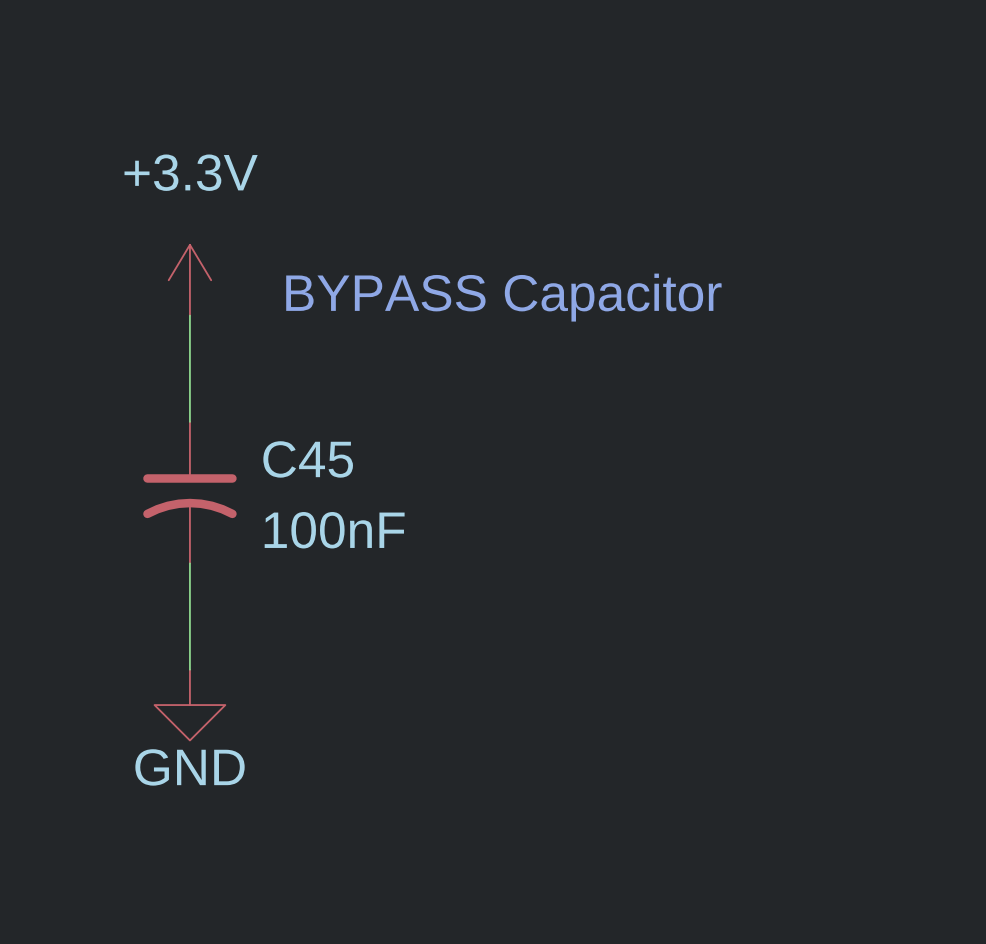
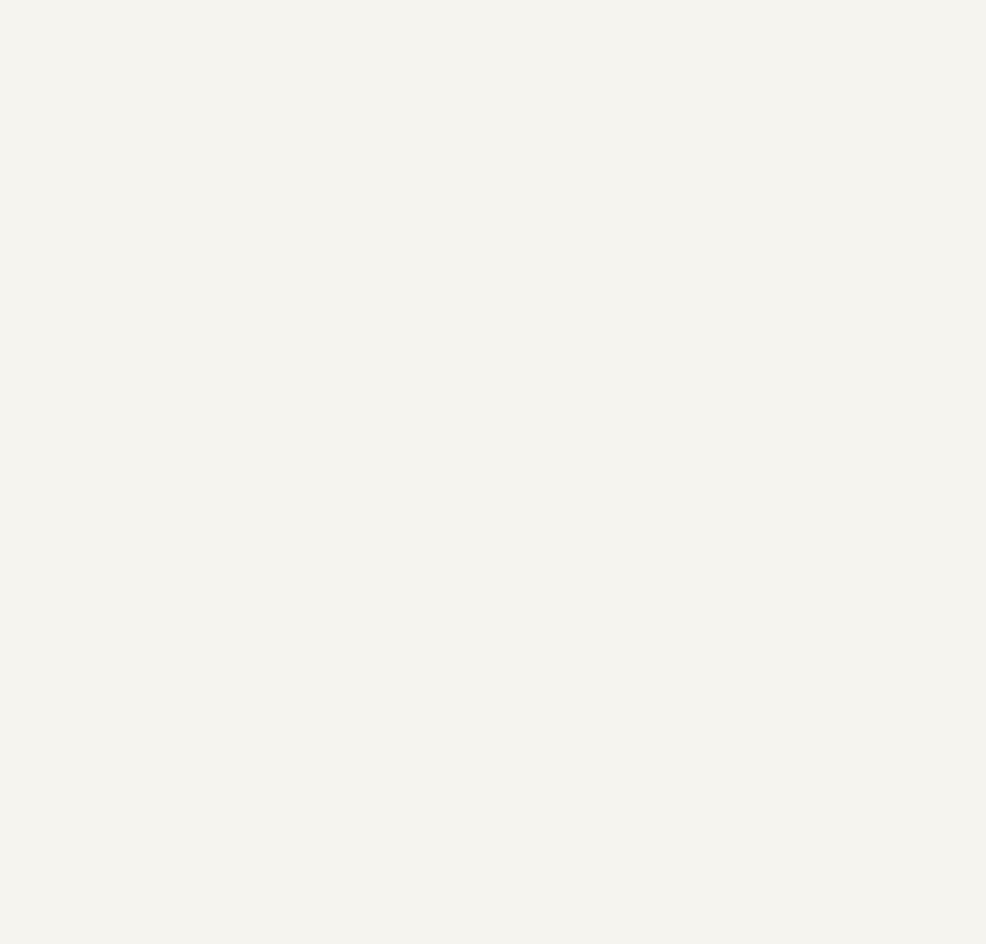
power symbol: +3.3V (189, 280) -> none
text: BYPASS Capacitor (503, 297) -> none
wire: (189, 315) (189, 421) -> none
C45: 100nF (189, 492) -> none
wire: (189, 563) (189, 669) -> none
power symbol: GND (189, 705) -> none

